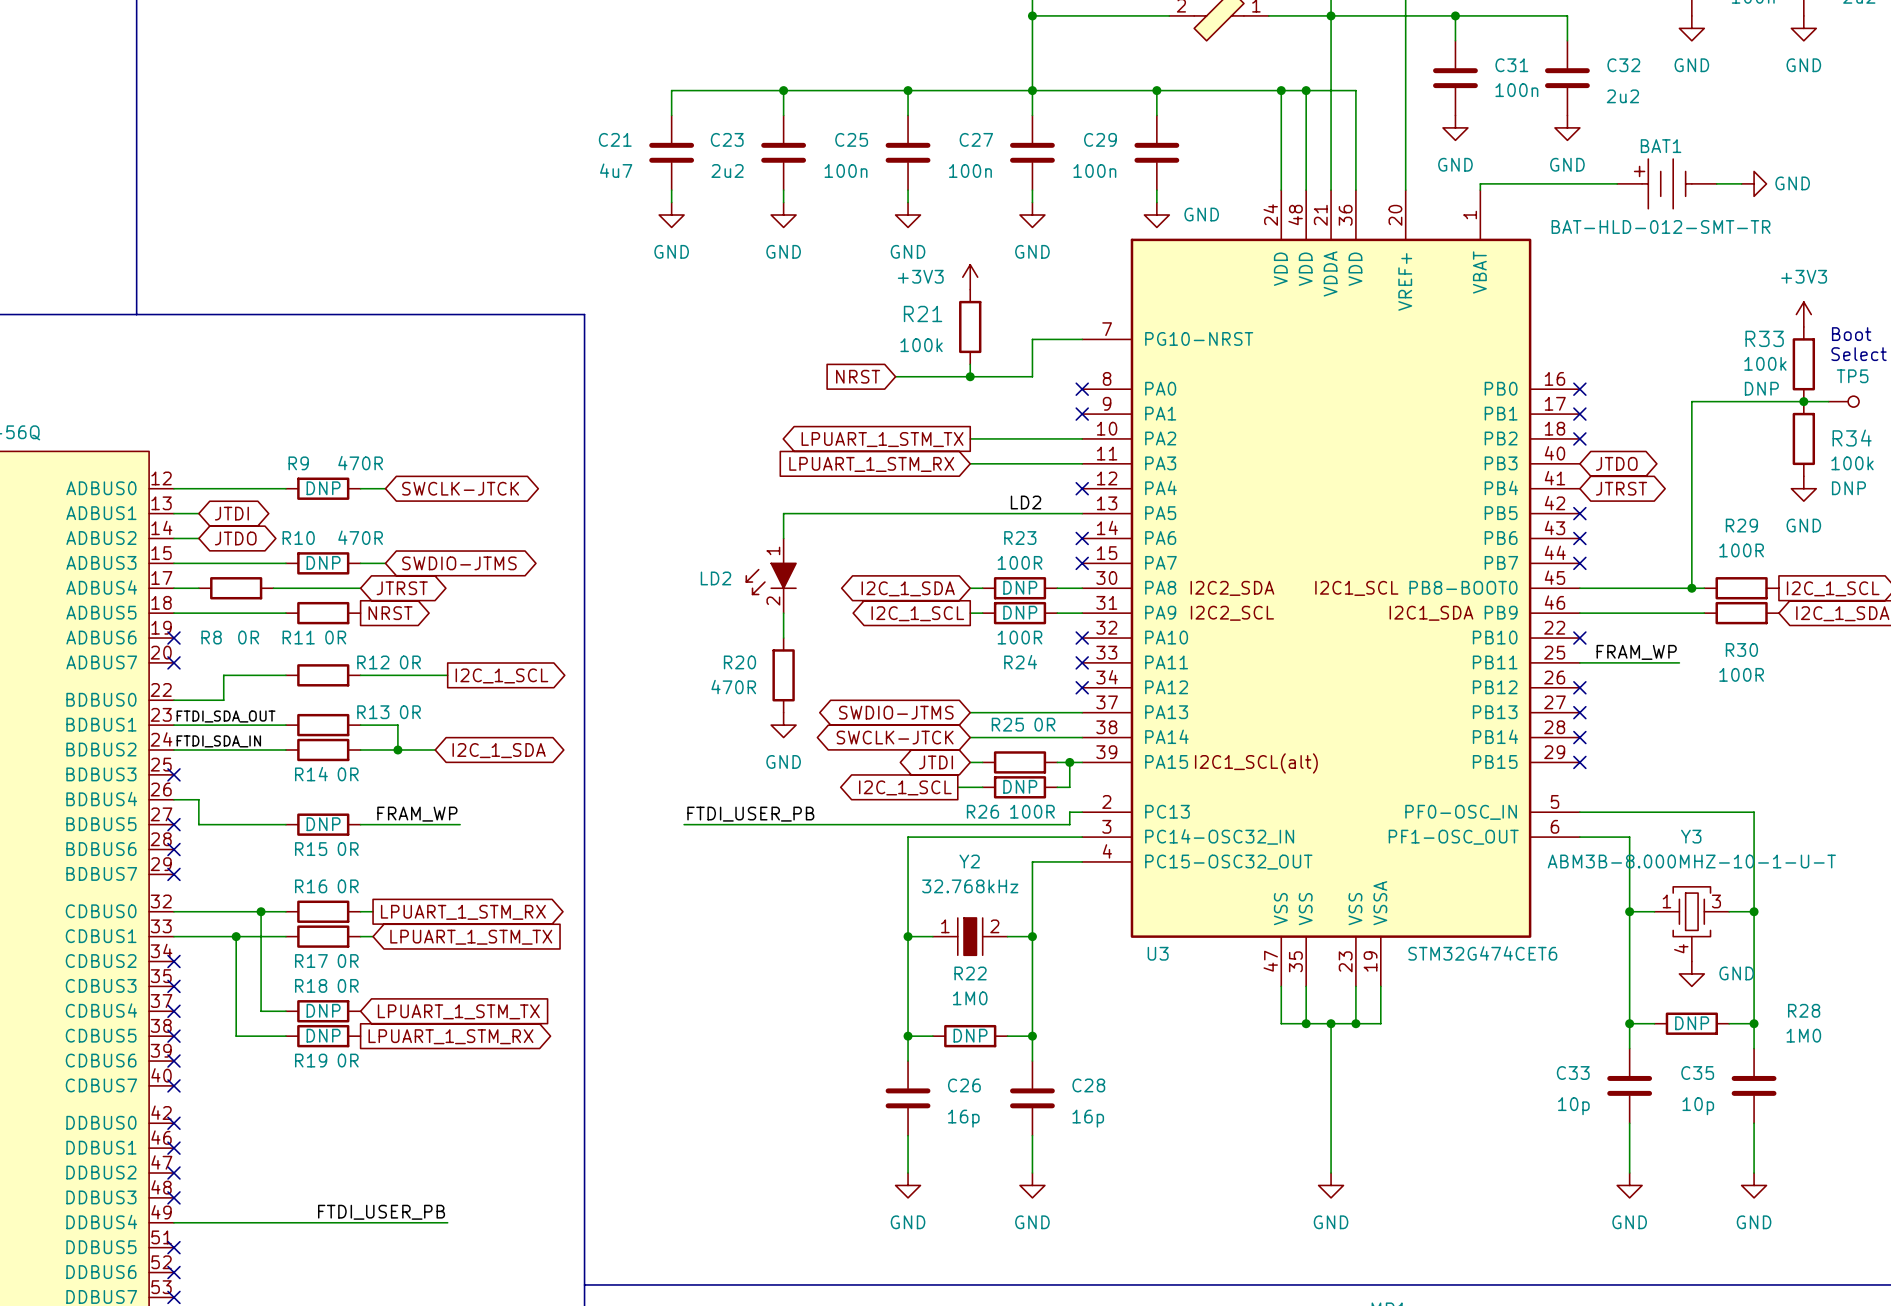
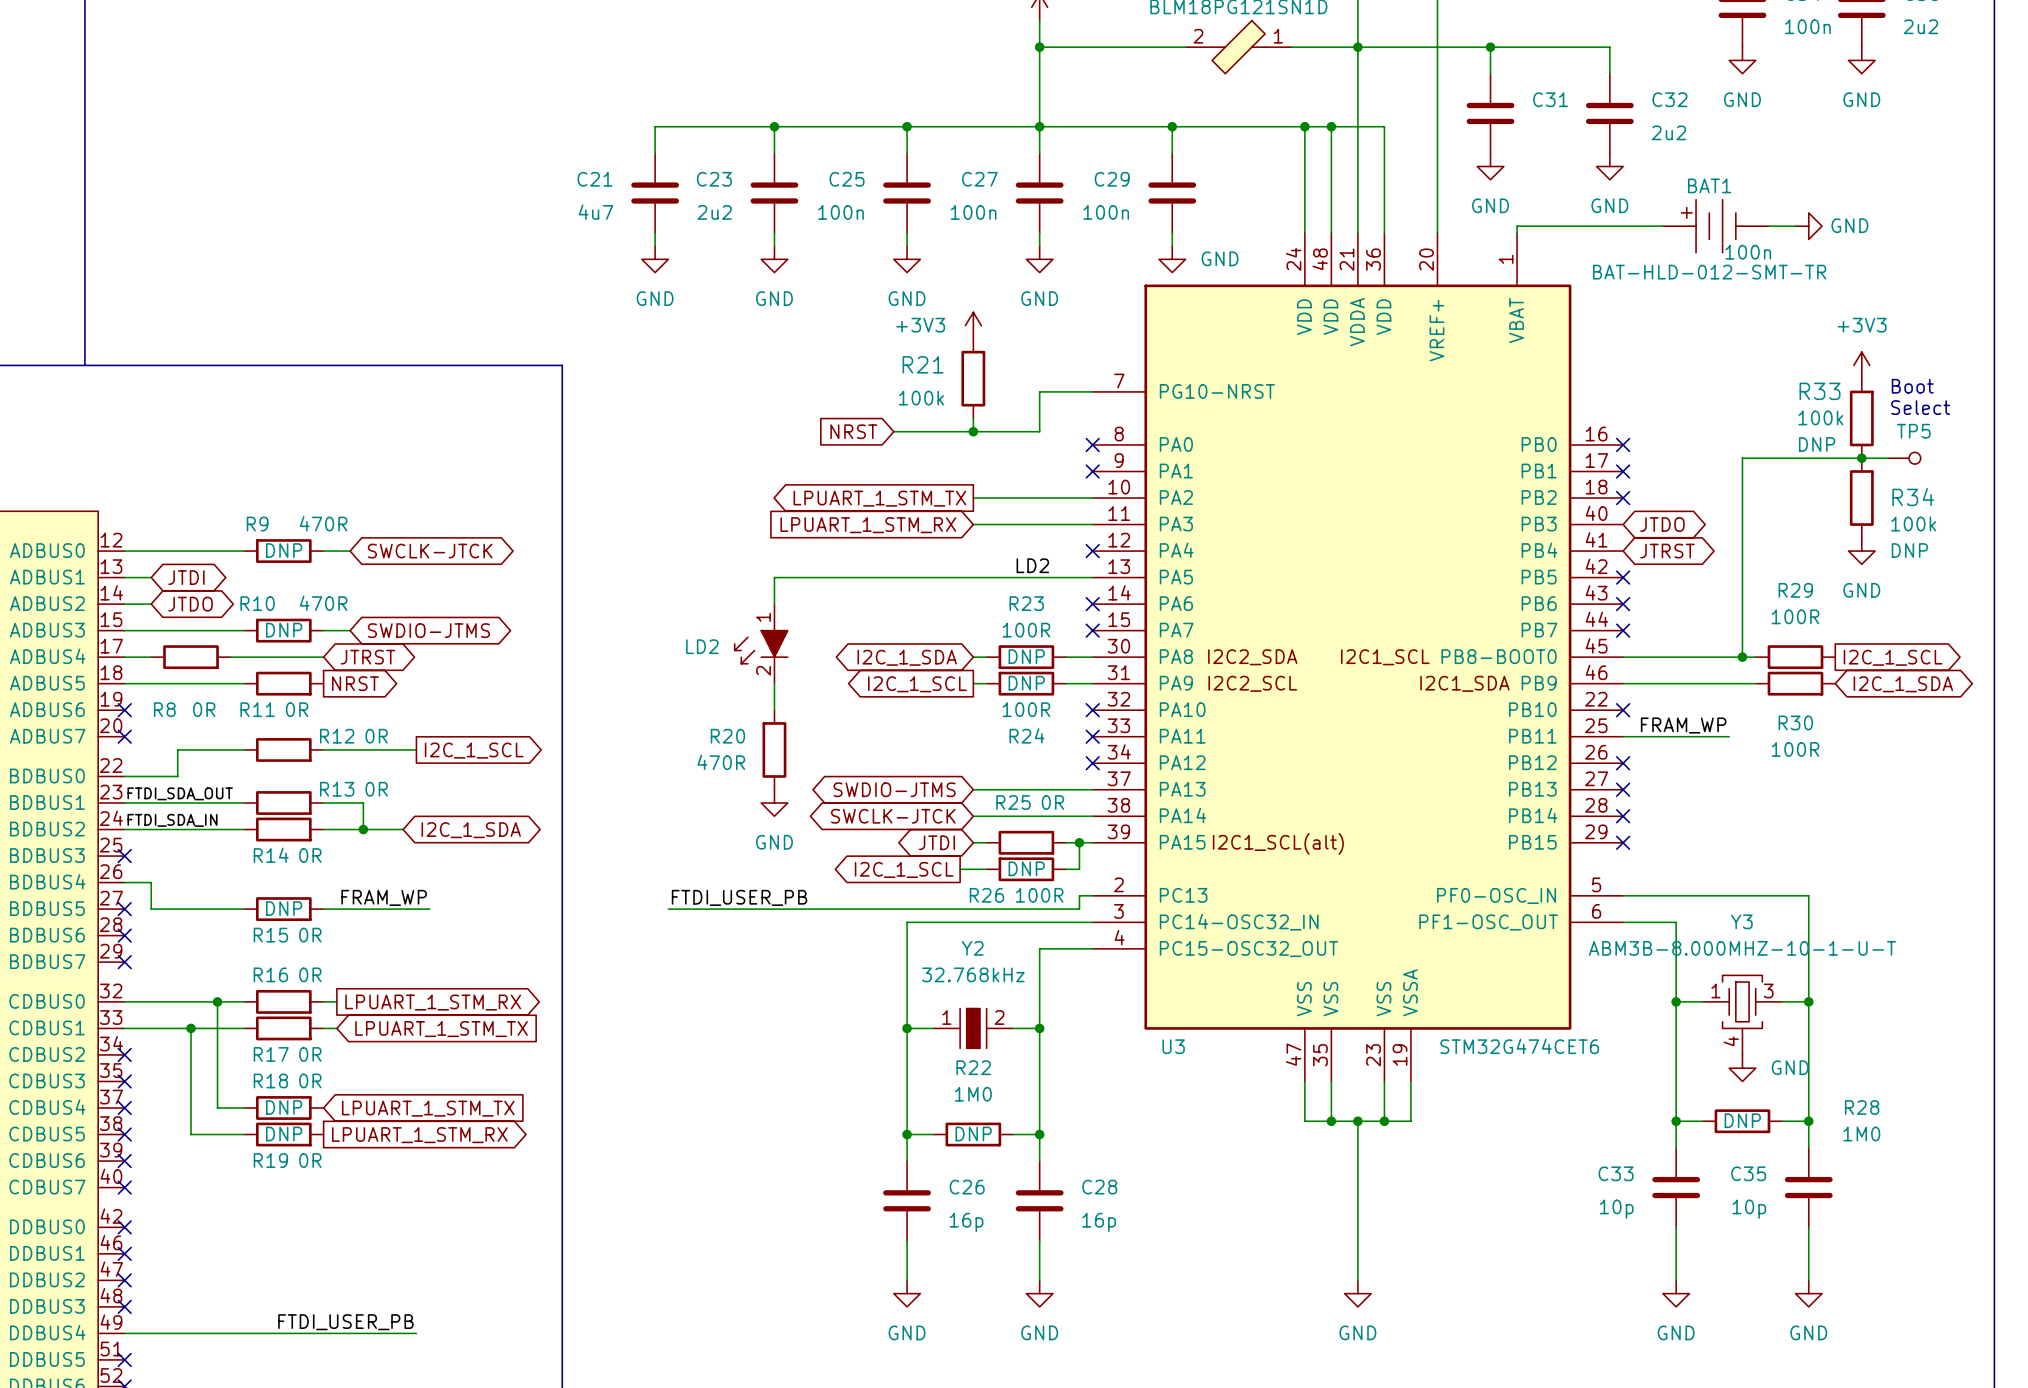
C31 text position: 100n (1516, 90) -> 100n (1748, 252)

